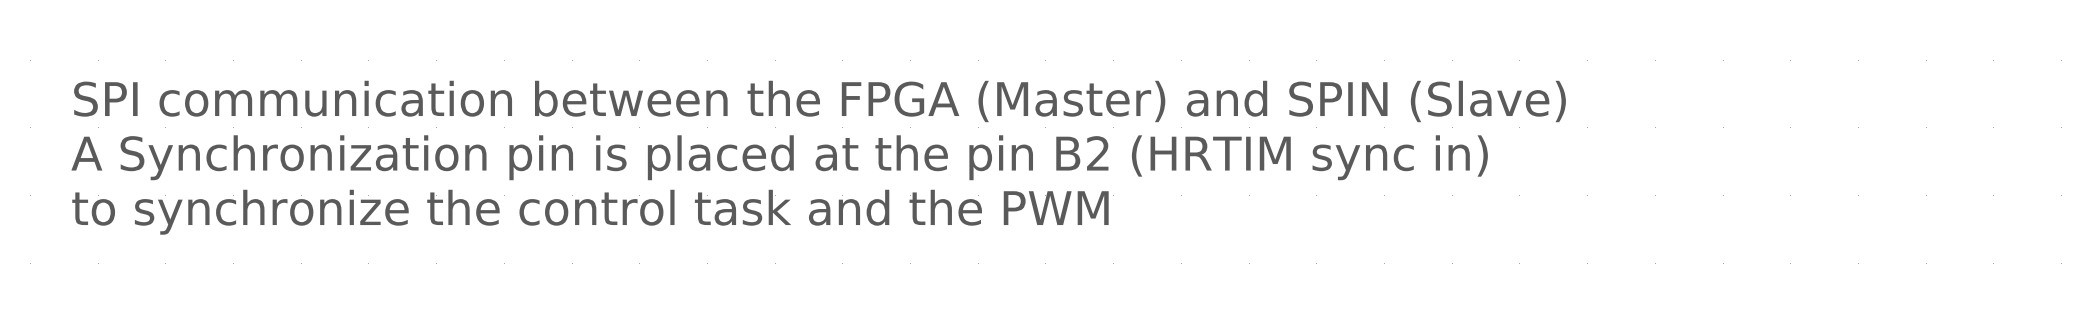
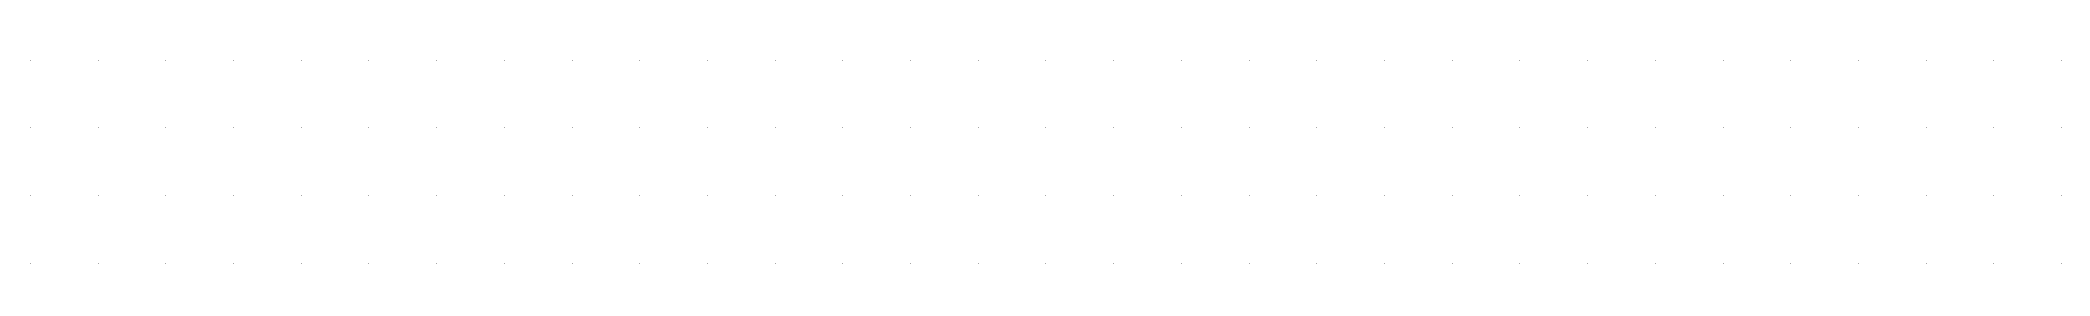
text: SPI communication between the FPGA (Master) and SPIN (Slave) (820, 101) -> none
text: A Synchronization pin is placed at the pin B2 (HRTIM sync in) (779, 157) -> none
text: to synchronize the control task and the PWM (590, 212) -> none

